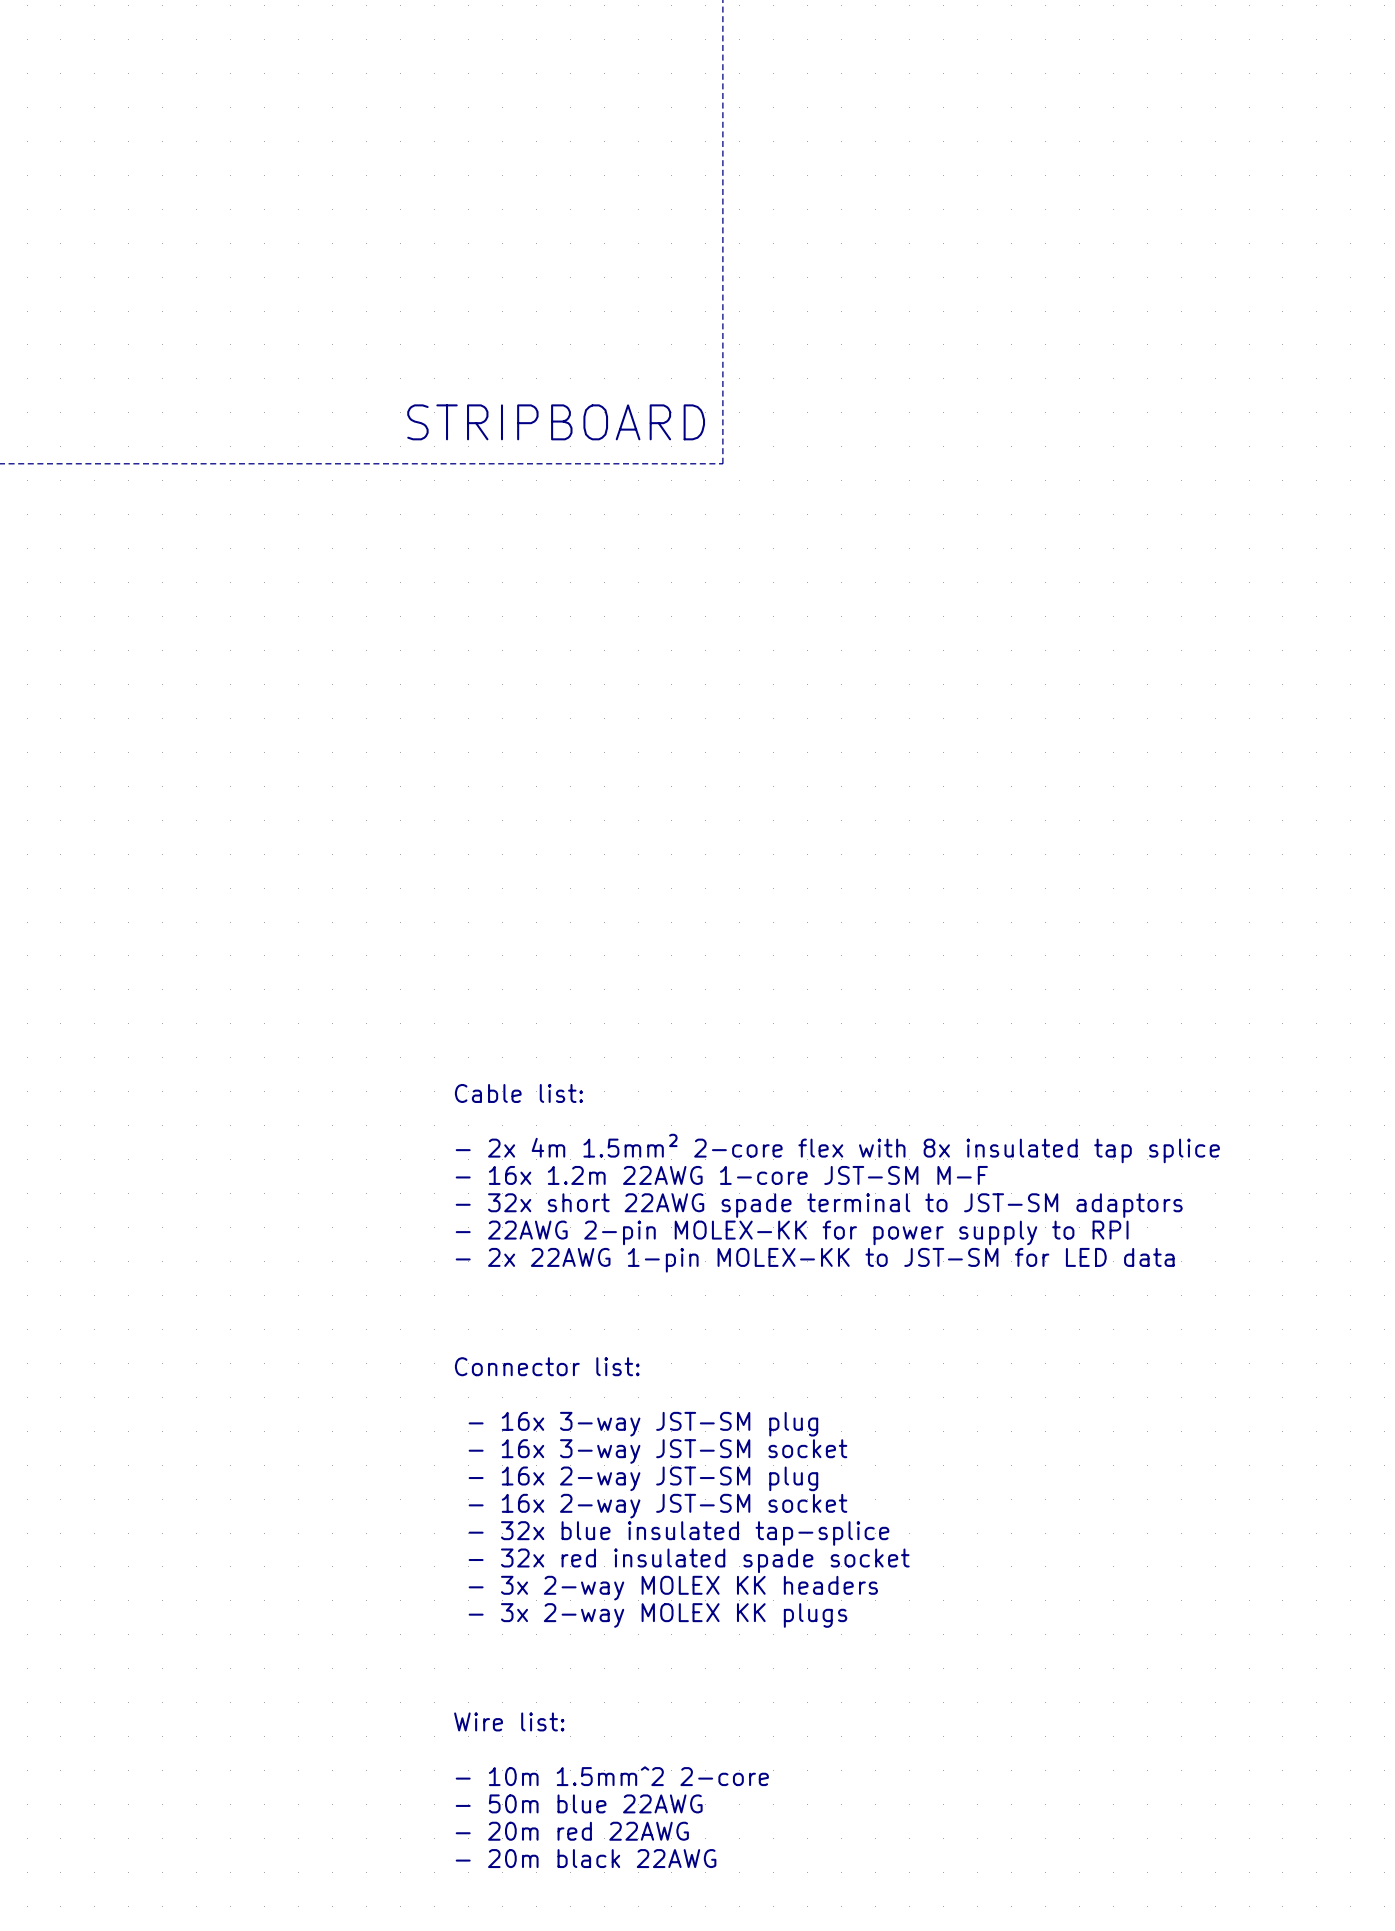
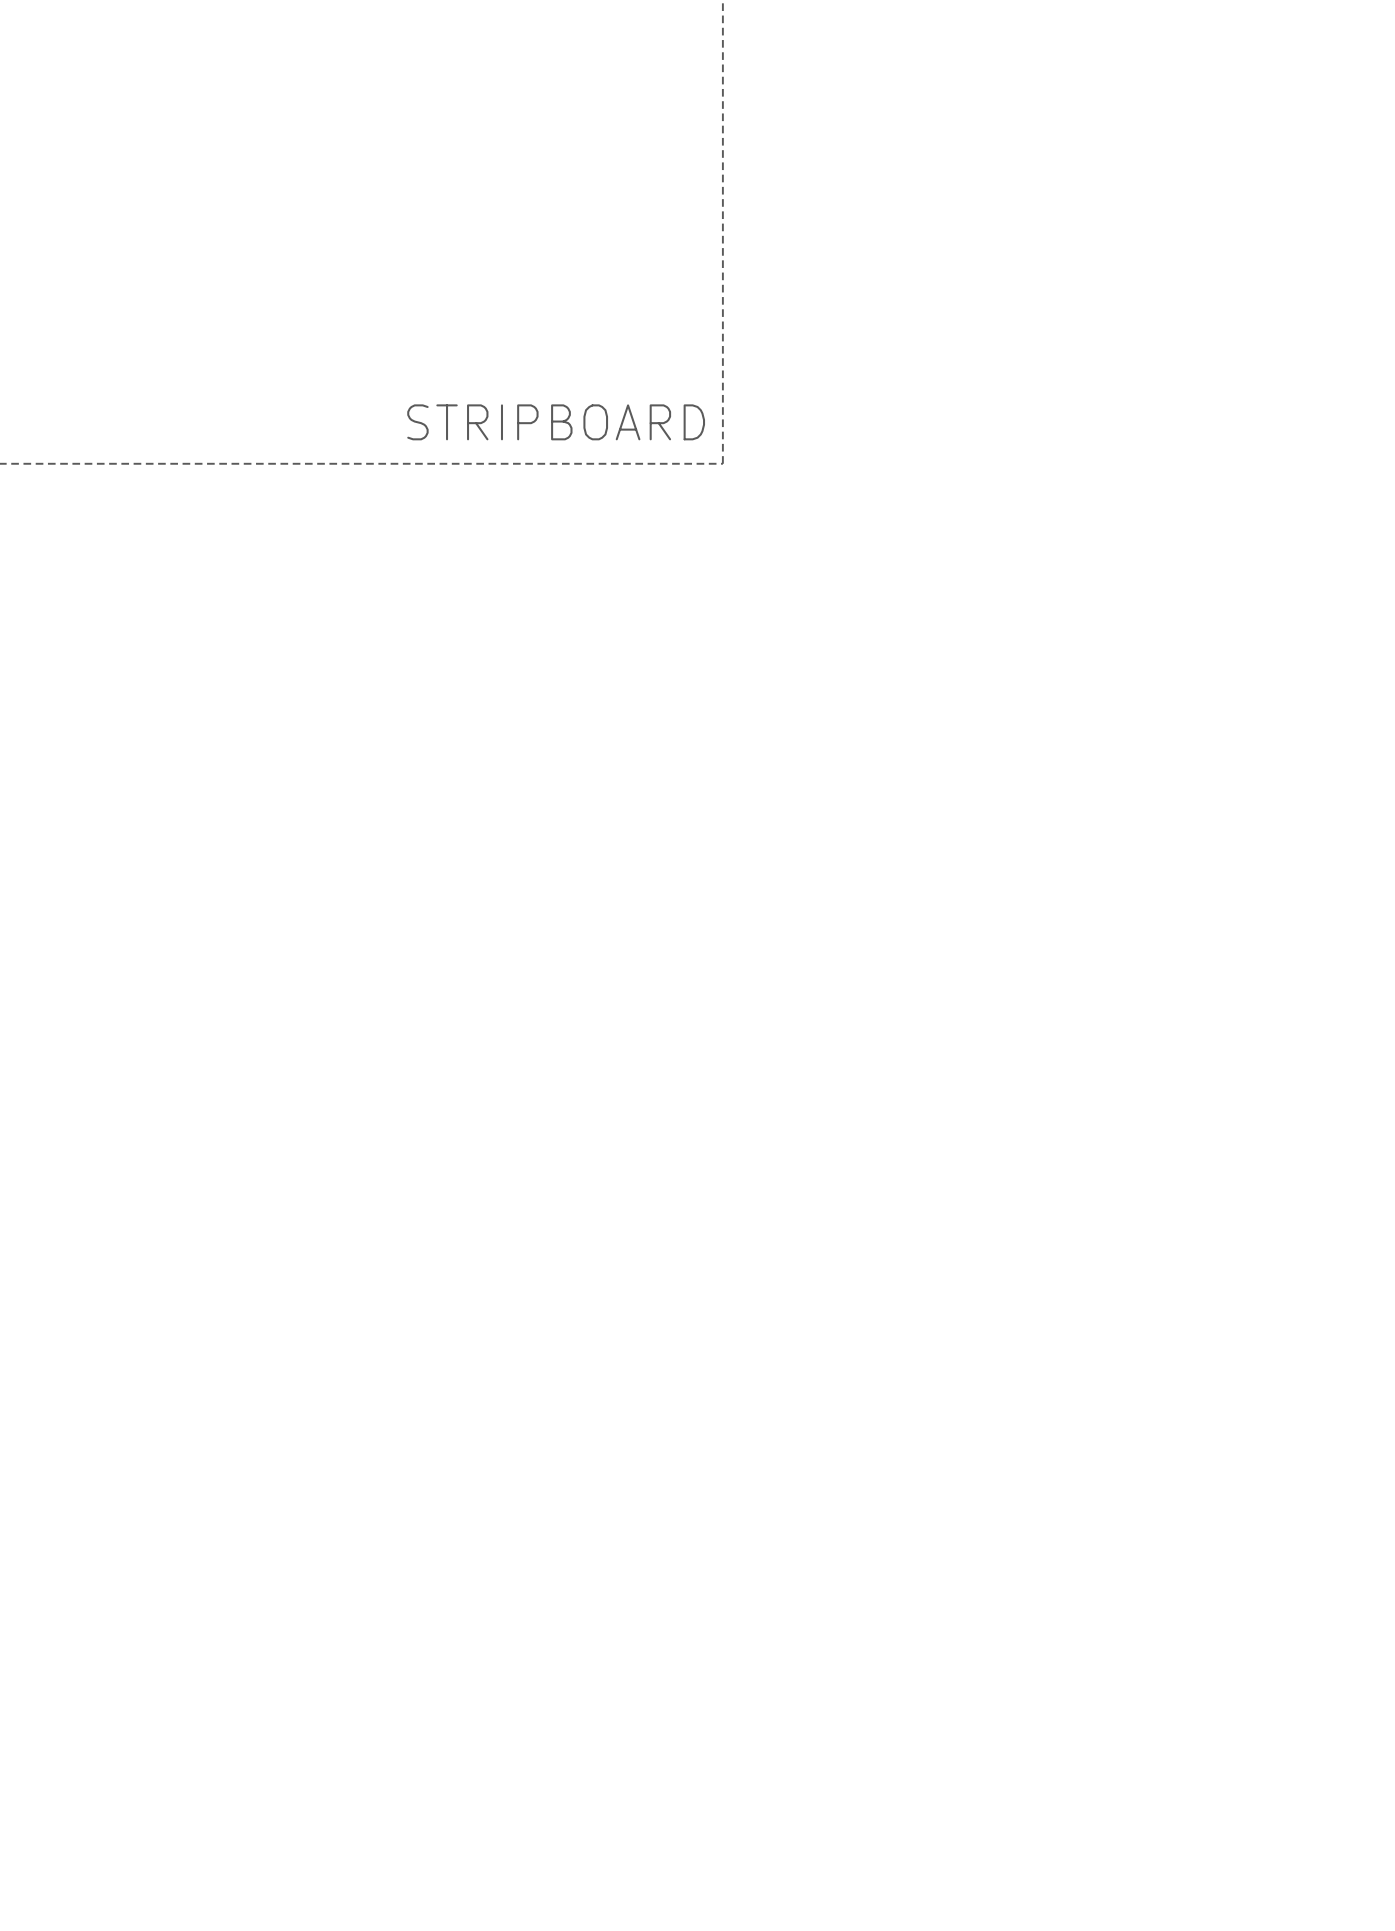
text: Cable list: (518, 1093) -> none
text: - 2x 4m 1.5mm² 2-core flex with 8x insulated tap splice (837, 1148) -> none
text: - 16x 1.2m 22AWG 1-core JST-SM M-F (721, 1175) -> none
text: - 32x short 22AWG spade terminal to JST-SM adaptors (819, 1205) -> none
text: - 22AWG 2-pin MOLEX-KK for power supply to RPI (792, 1232) -> none
text: - 2x 22AWG 1-pin MOLEX-KK to JST-SM for LED data (815, 1260) -> none
text: Connector list: (547, 1366) -> none
text: - 16x 3-way JST-SM plug (643, 1424) -> none
text: - 16x 3-way JST-SM socket (657, 1451) -> none
text: - 16x 2-way JST-SM plug (643, 1478) -> none
text: - 16x 2-way JST-SM socket (657, 1506) -> none
text: - 32x blue insulated tap-splice (678, 1533) -> none
text: - 32x red insulated spade socket (689, 1560) -> none
text: - 3x 2-way MOLEX KK headers (673, 1588) -> none
text: - 3x 2-way MOLEX KK plugs (657, 1615) -> none
text: Wire list: (509, 1721) -> none
text: - 10m 1.5mm^2 2-core (612, 1776) -> none
text: - 50m blue 22AWG (579, 1803) -> none
text: - 20m red 22AWG (572, 1831) -> none
text: - 20m black 22AWG (586, 1858) -> none

